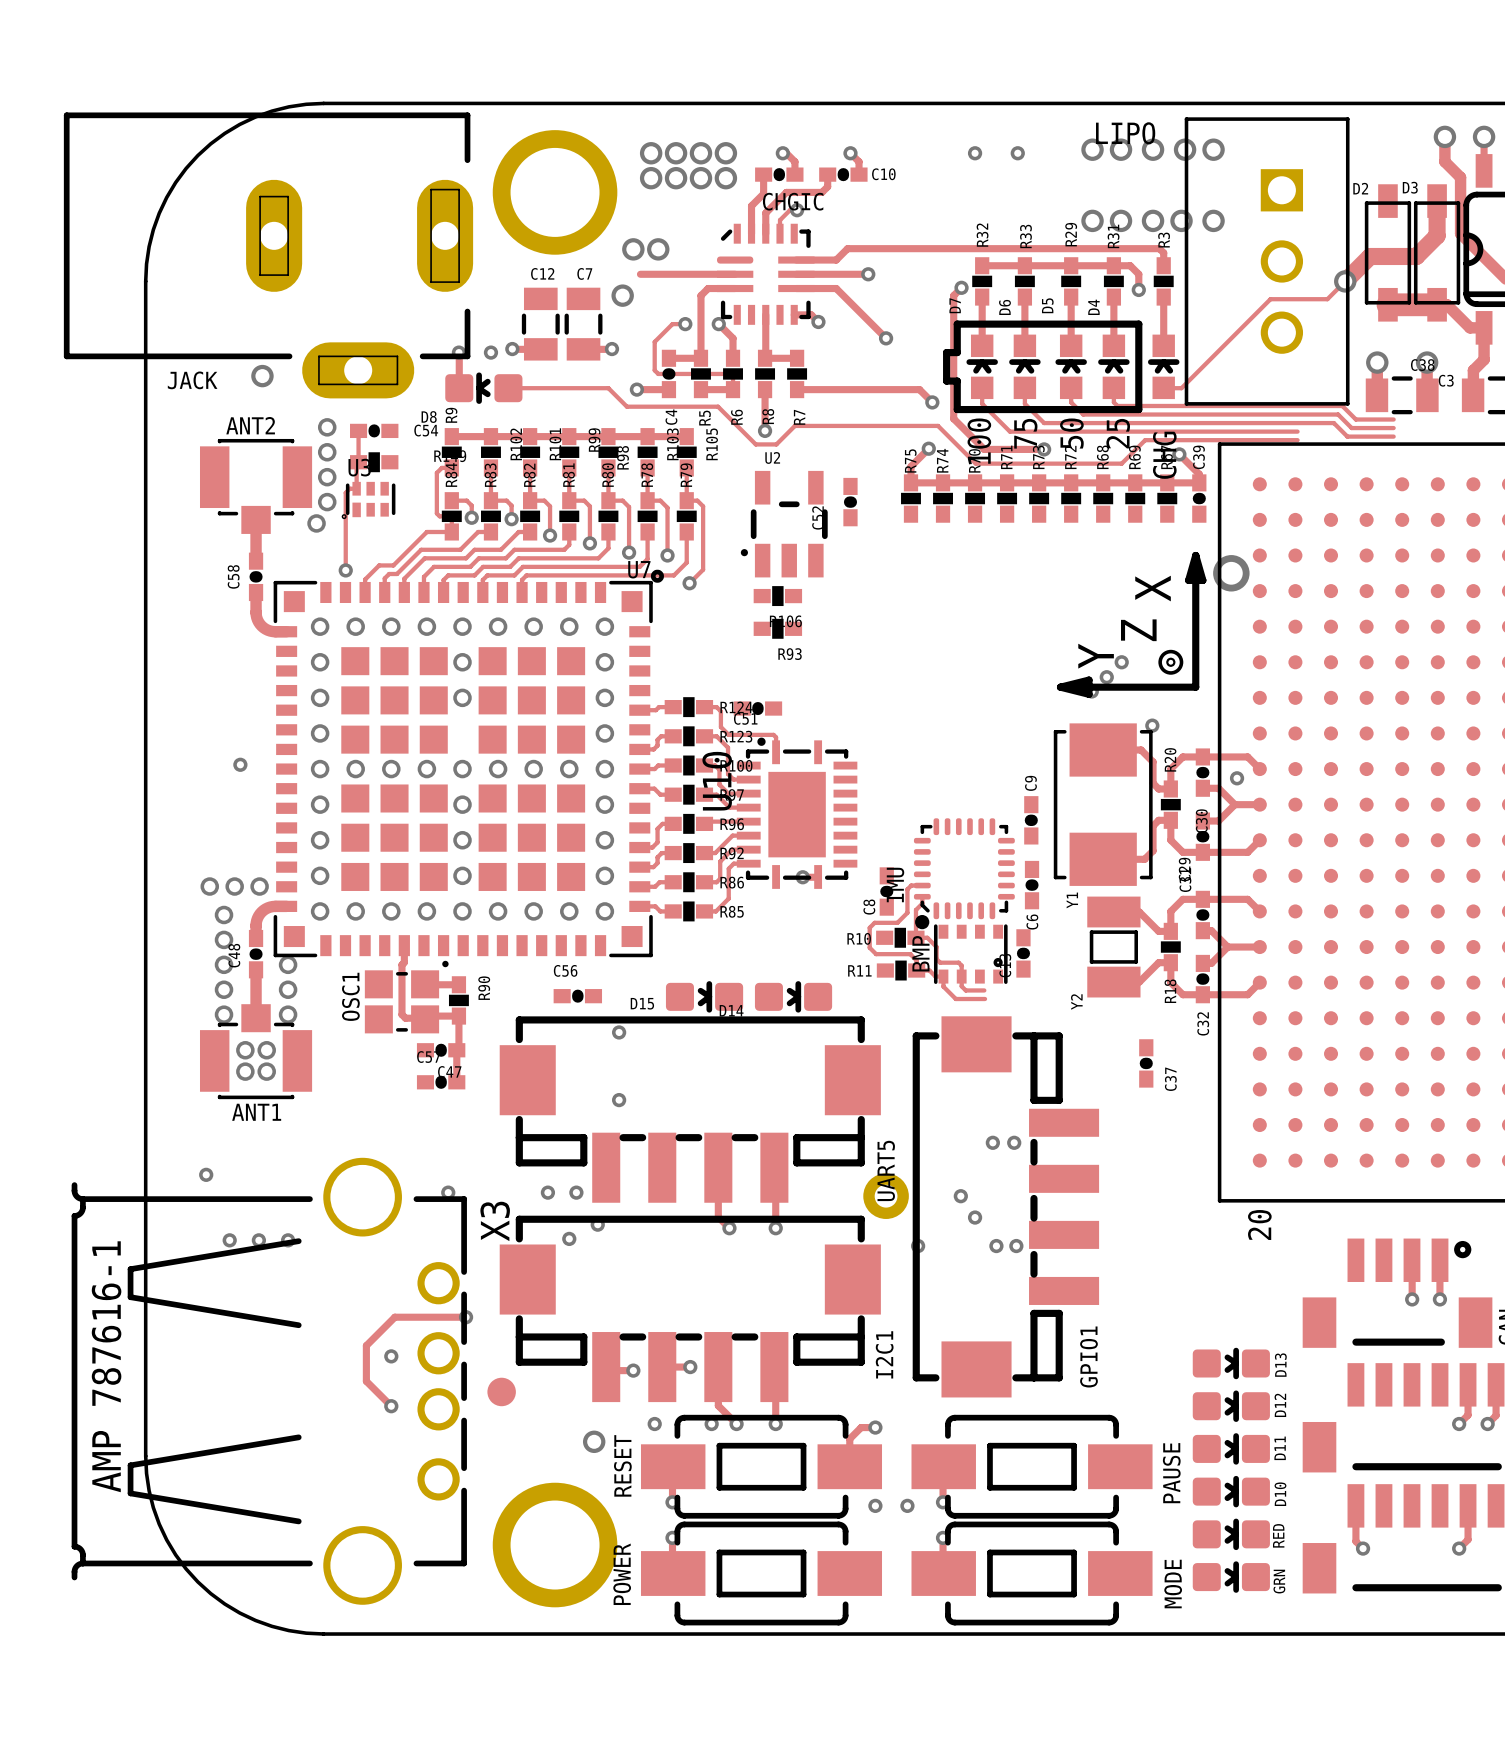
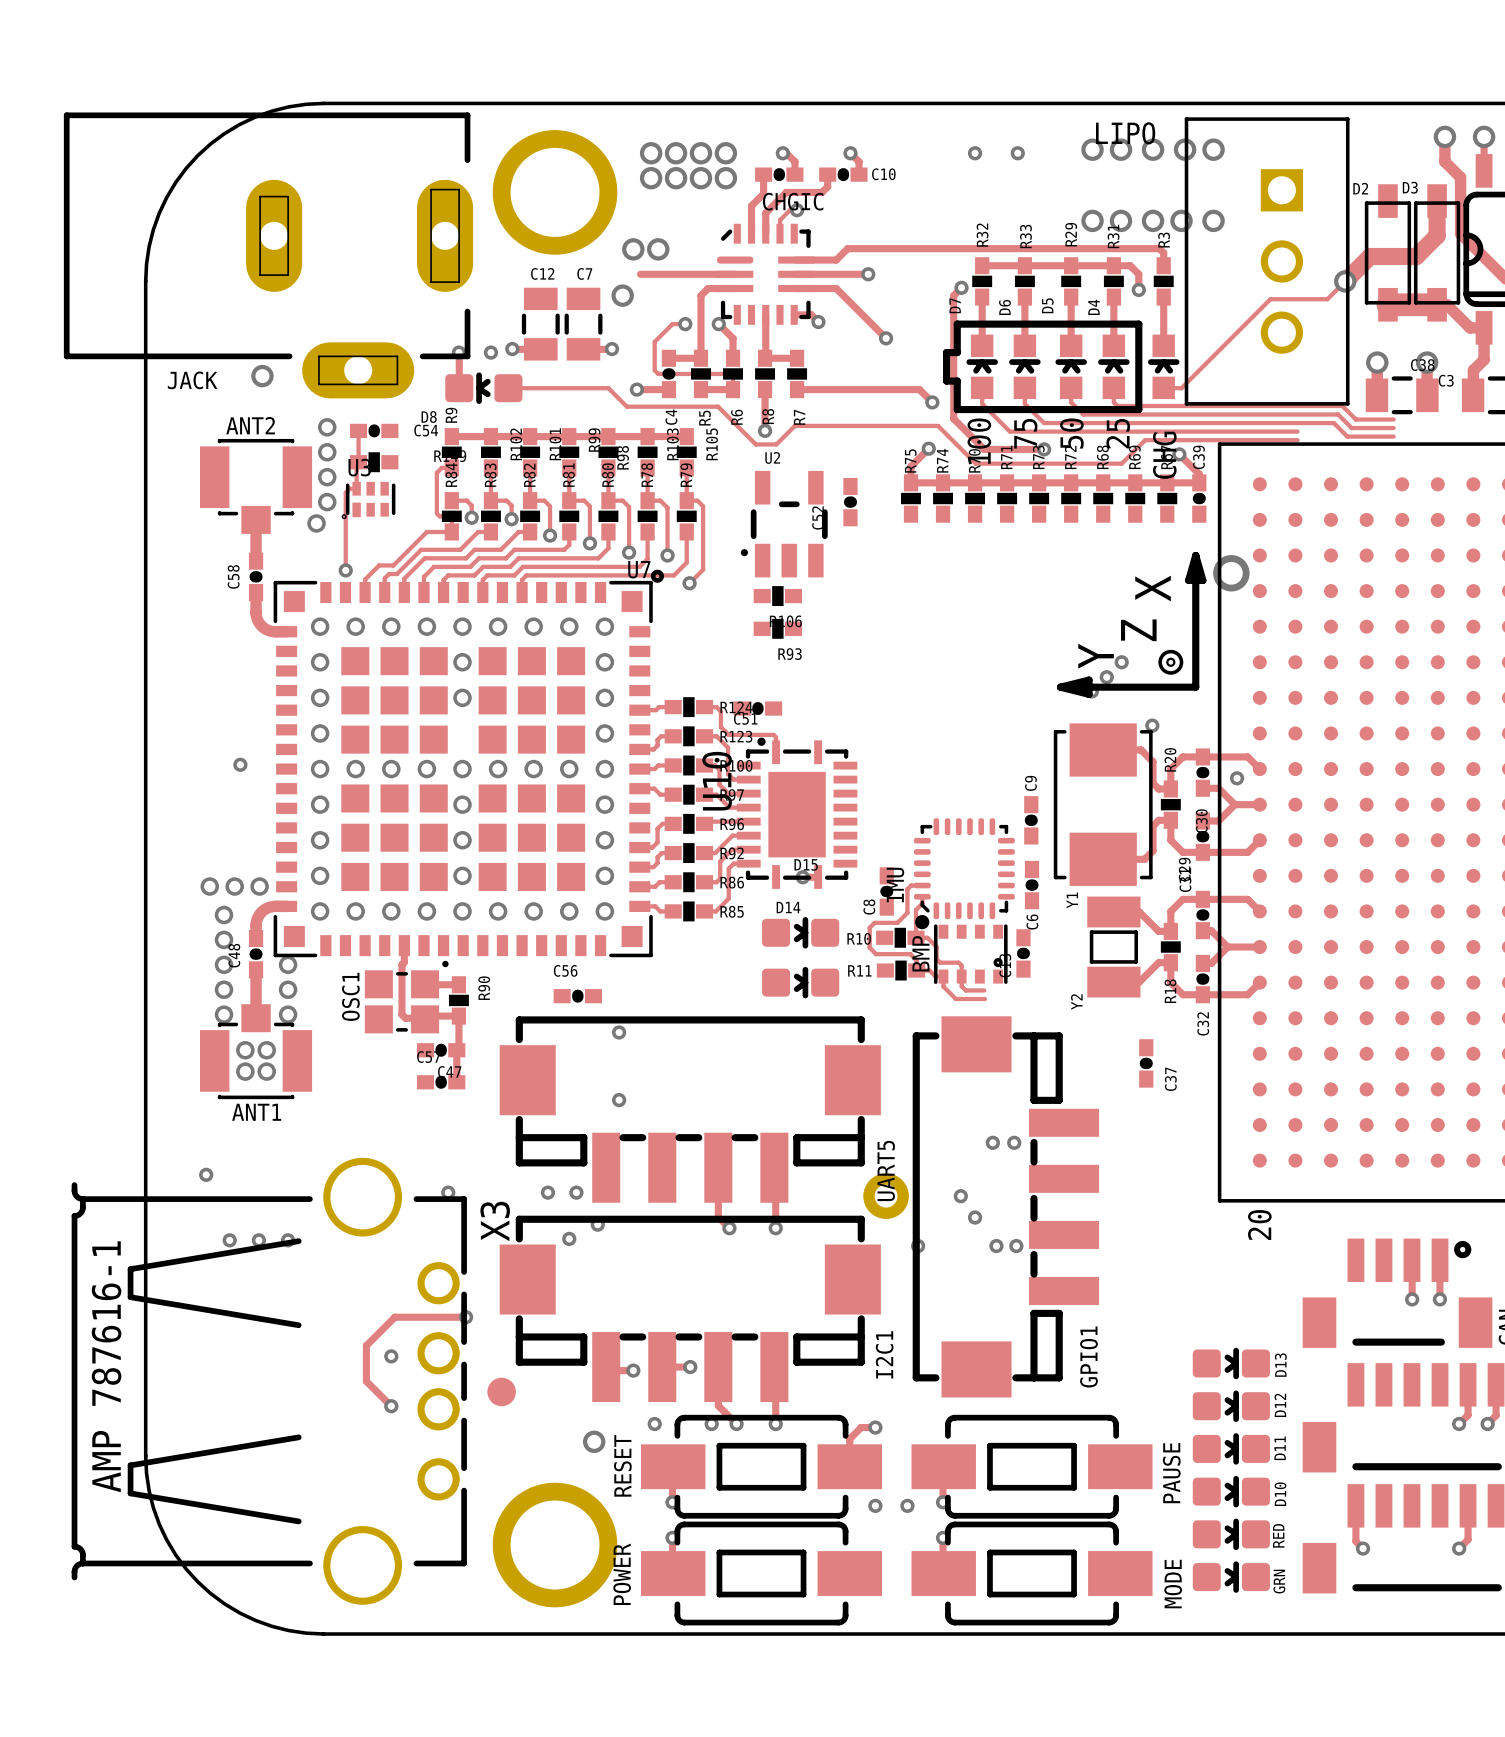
D15 position: (704, 996) -> (800, 982)
D14 position: (793, 996) -> (800, 932)
D15 name position: D15 (642, 1003) -> D15 (806, 864)
D14 name position: D14 (731, 1010) -> D14 (788, 907)

